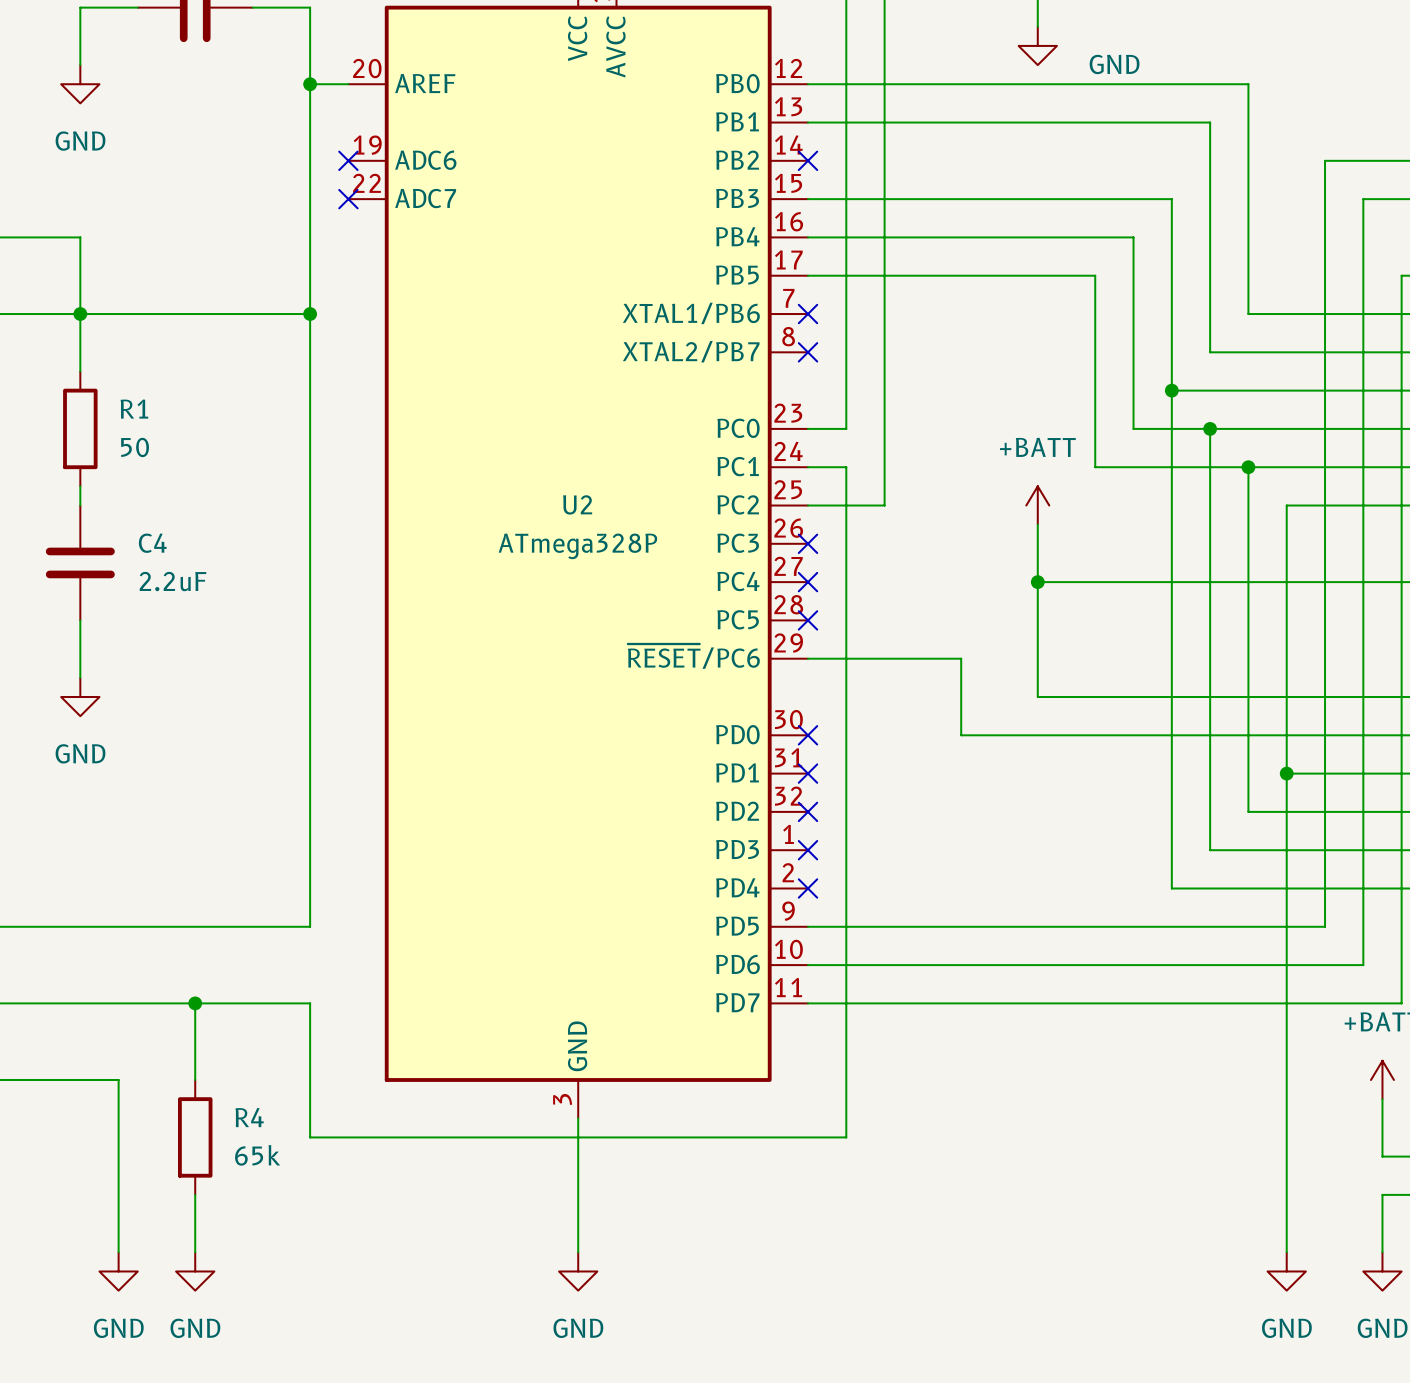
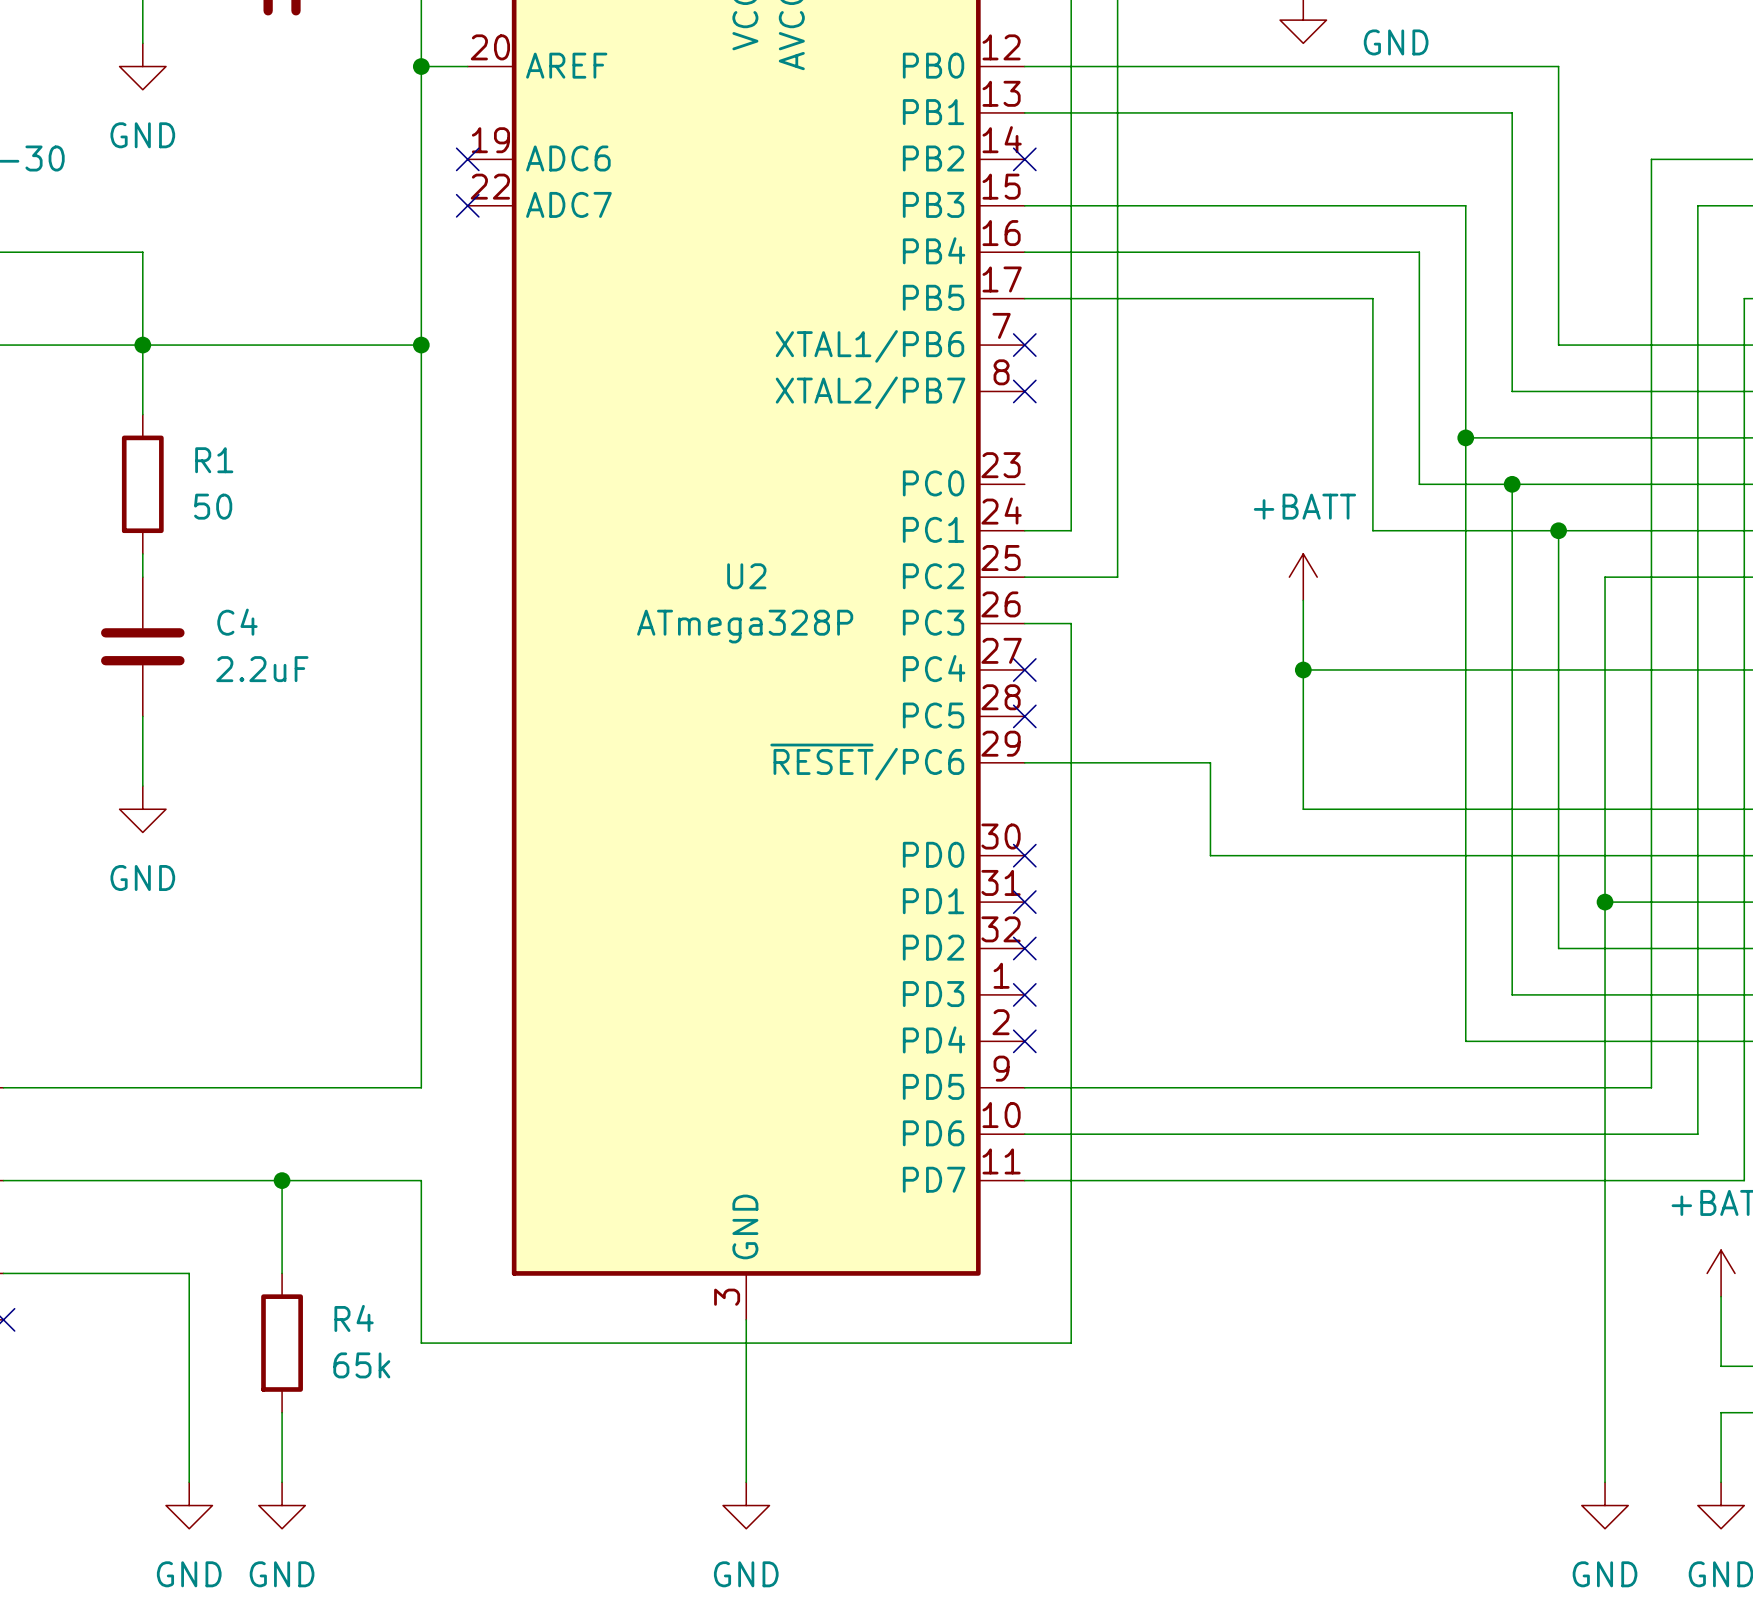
wire: (808, 428) (846, 428) -> (1071, 530) (1071, 484)
wire: (846, 467) (846, 543) -> (1024, 623) (1071, 623)
no-connect mark: (808, 543) -> none

